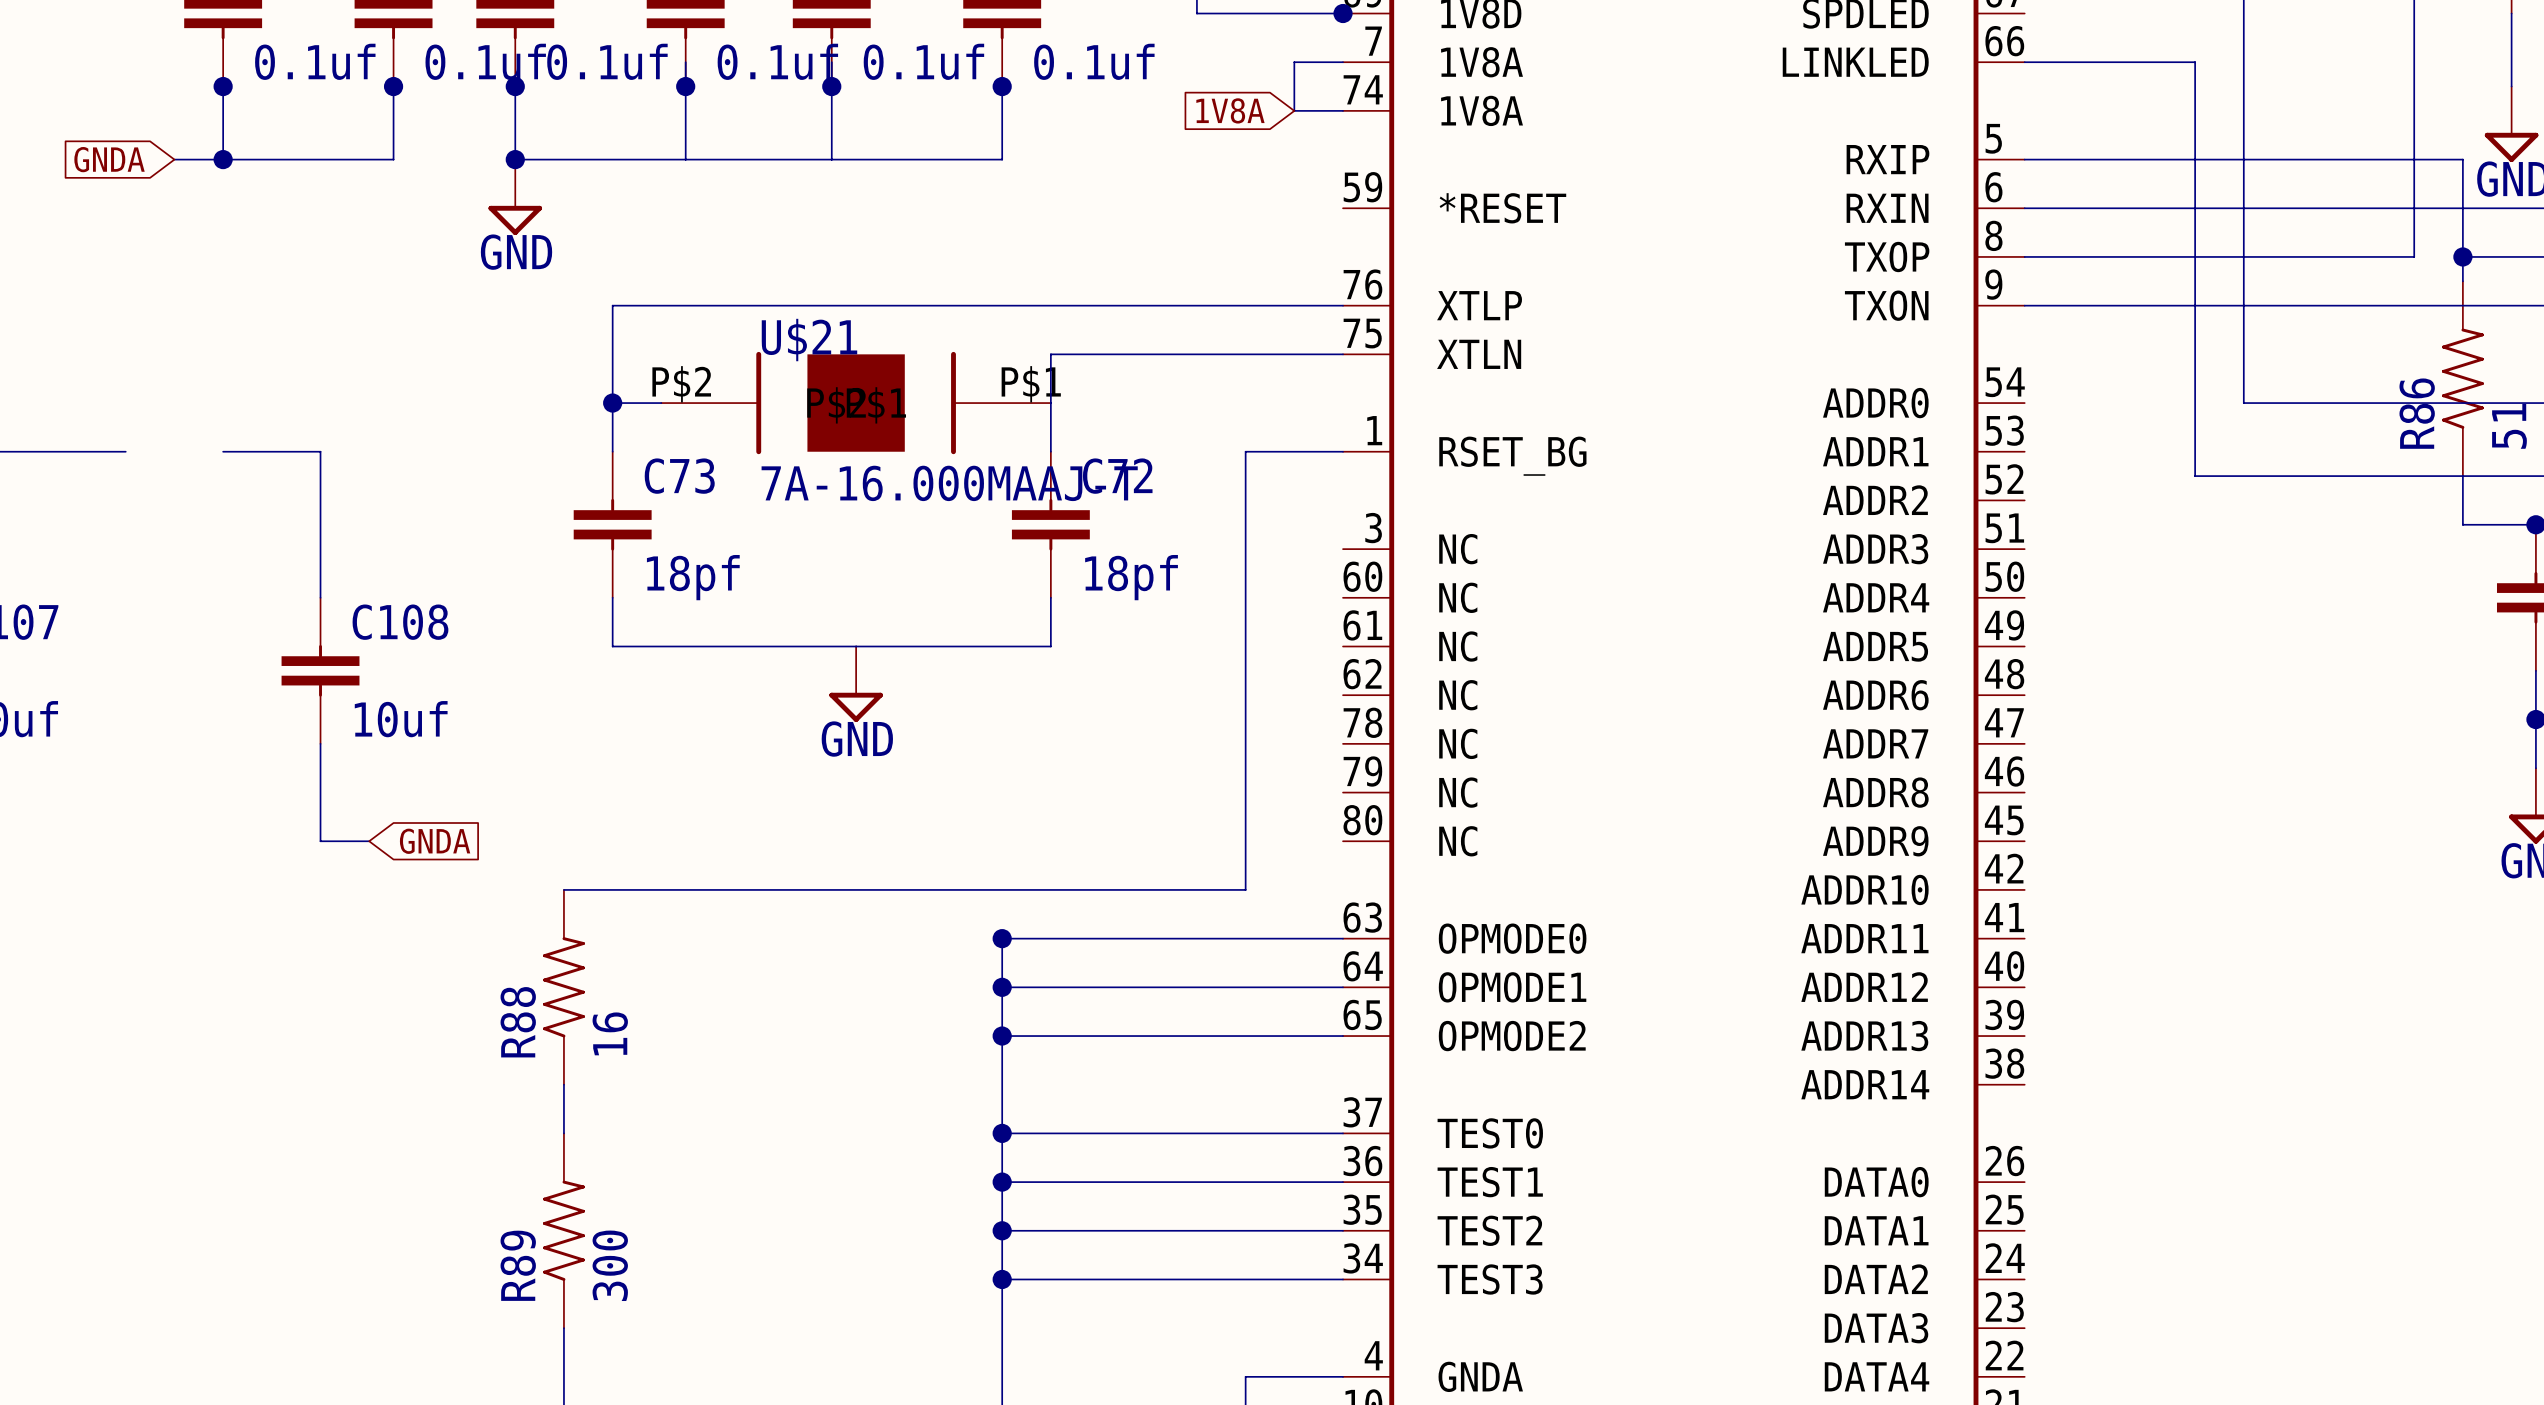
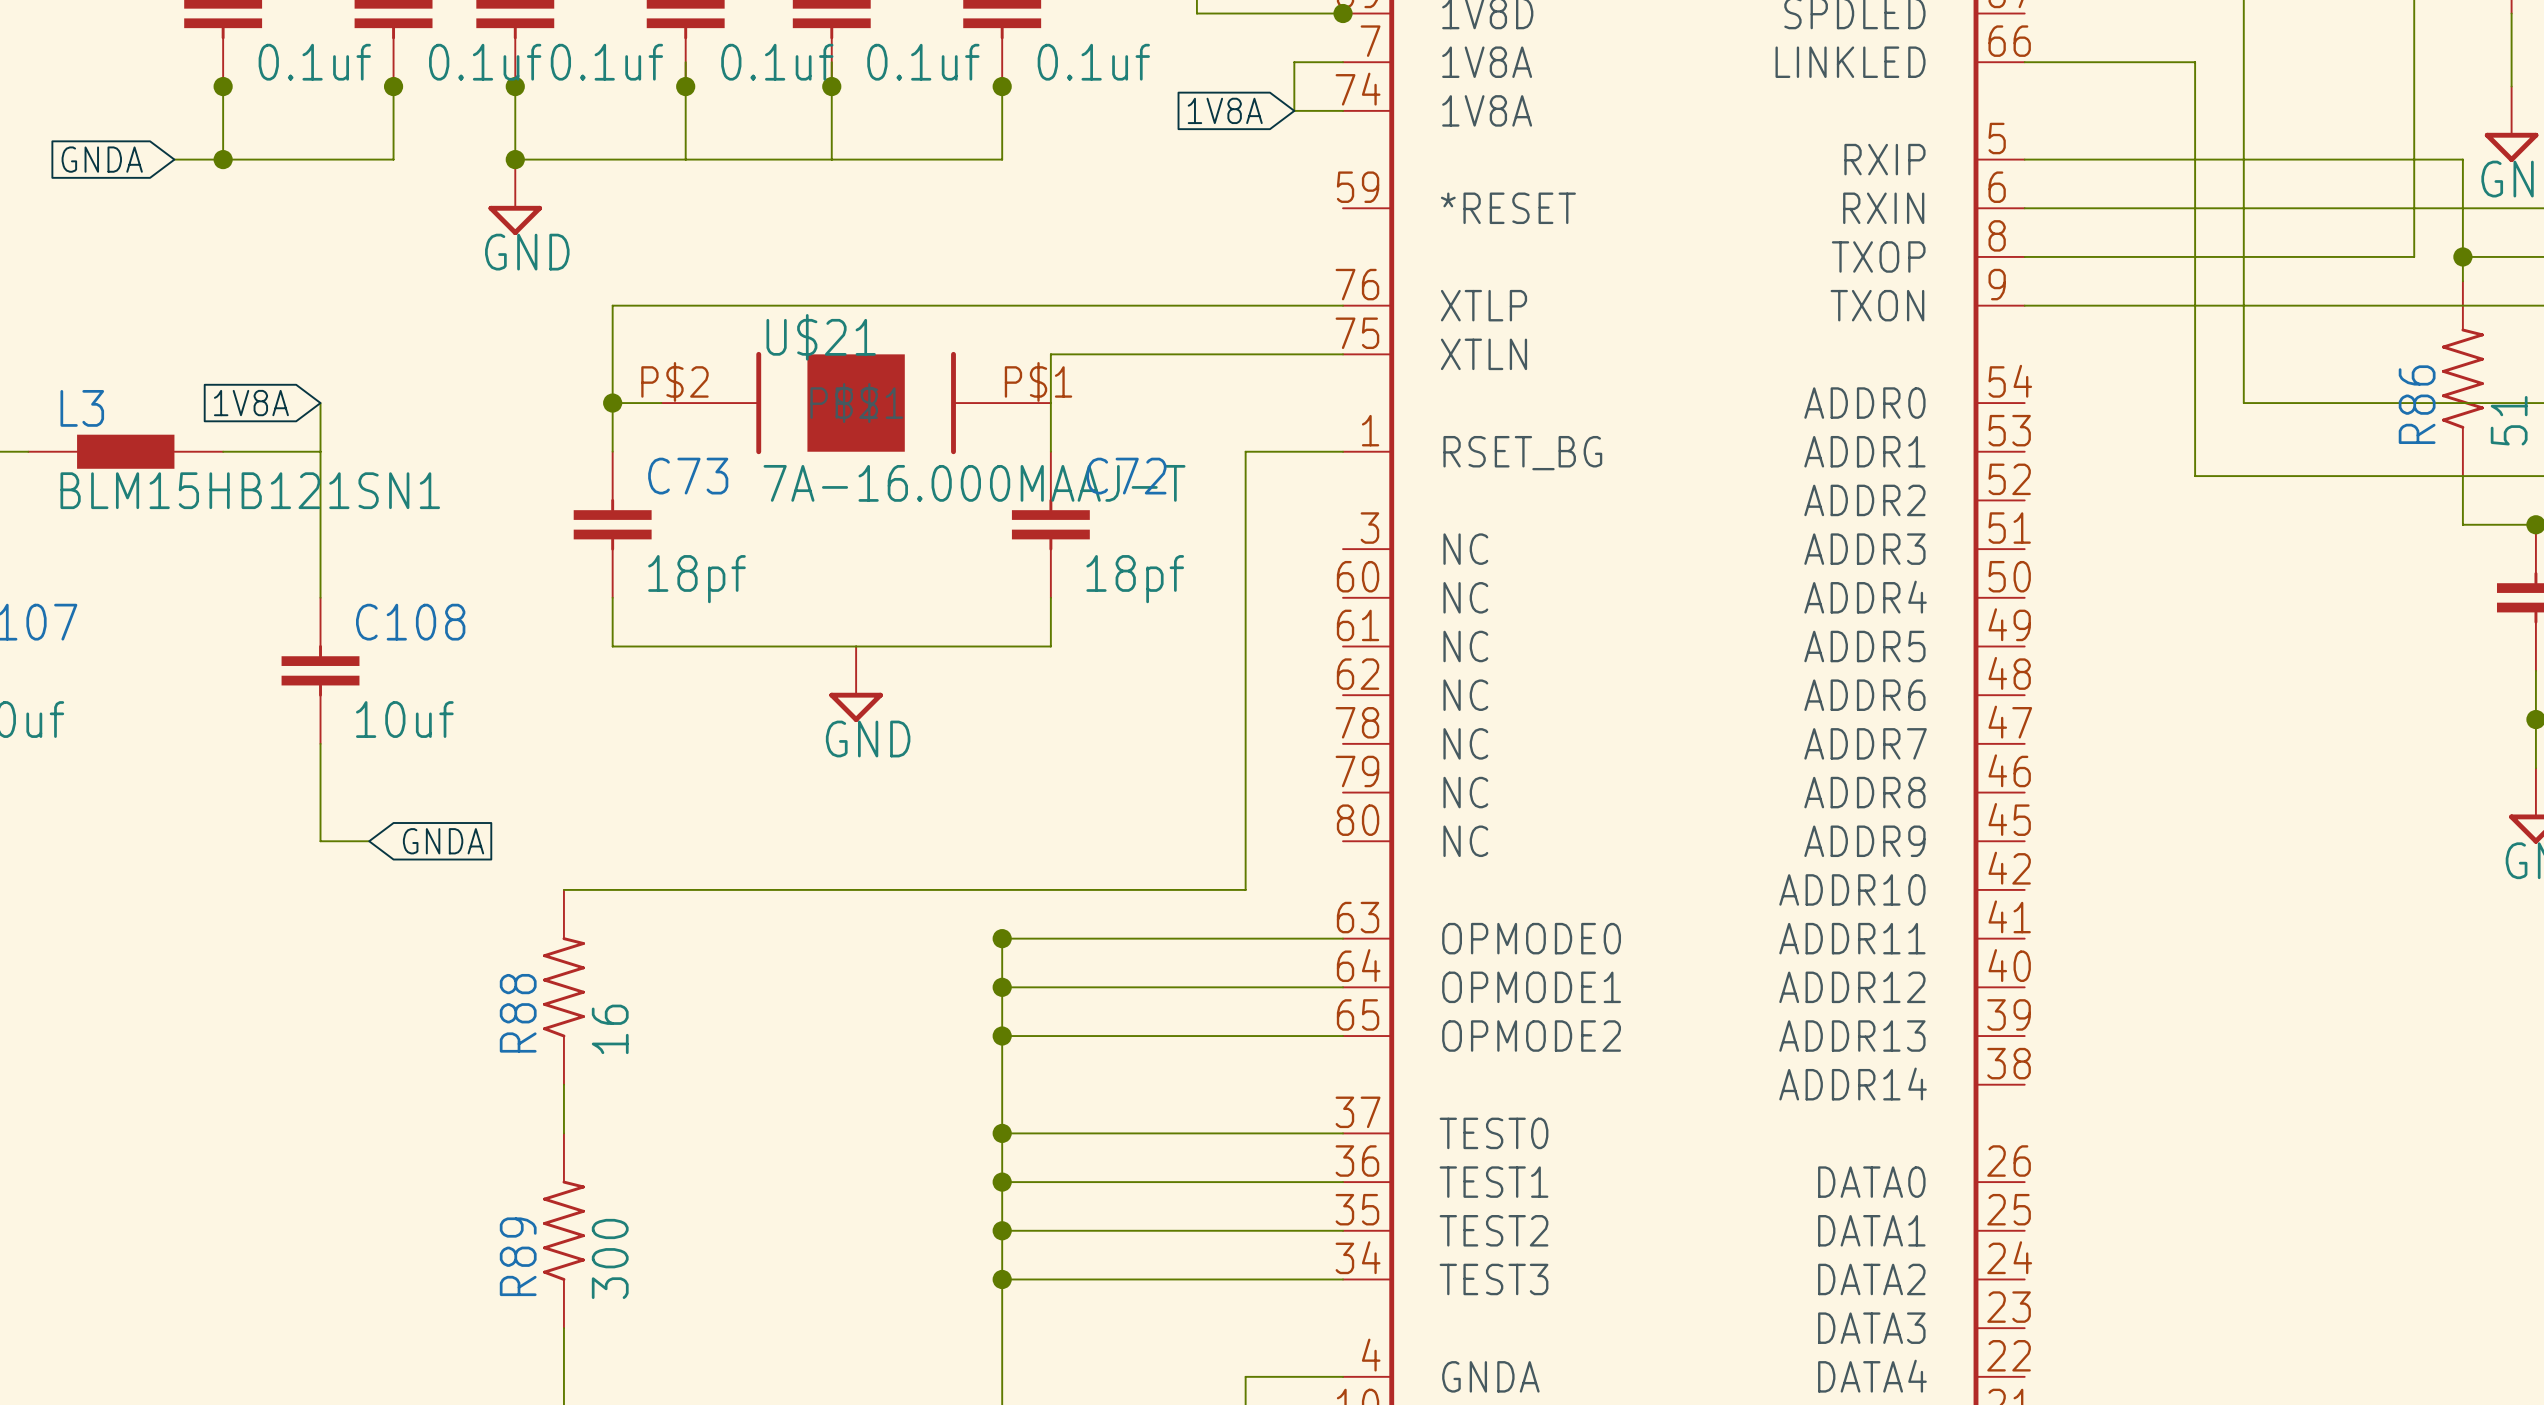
global label: none -> 1V8A (251, 403)
wire: none -> (320, 403) (320, 451)
L3: none -> BLM15HB121SN1 (125, 451)

